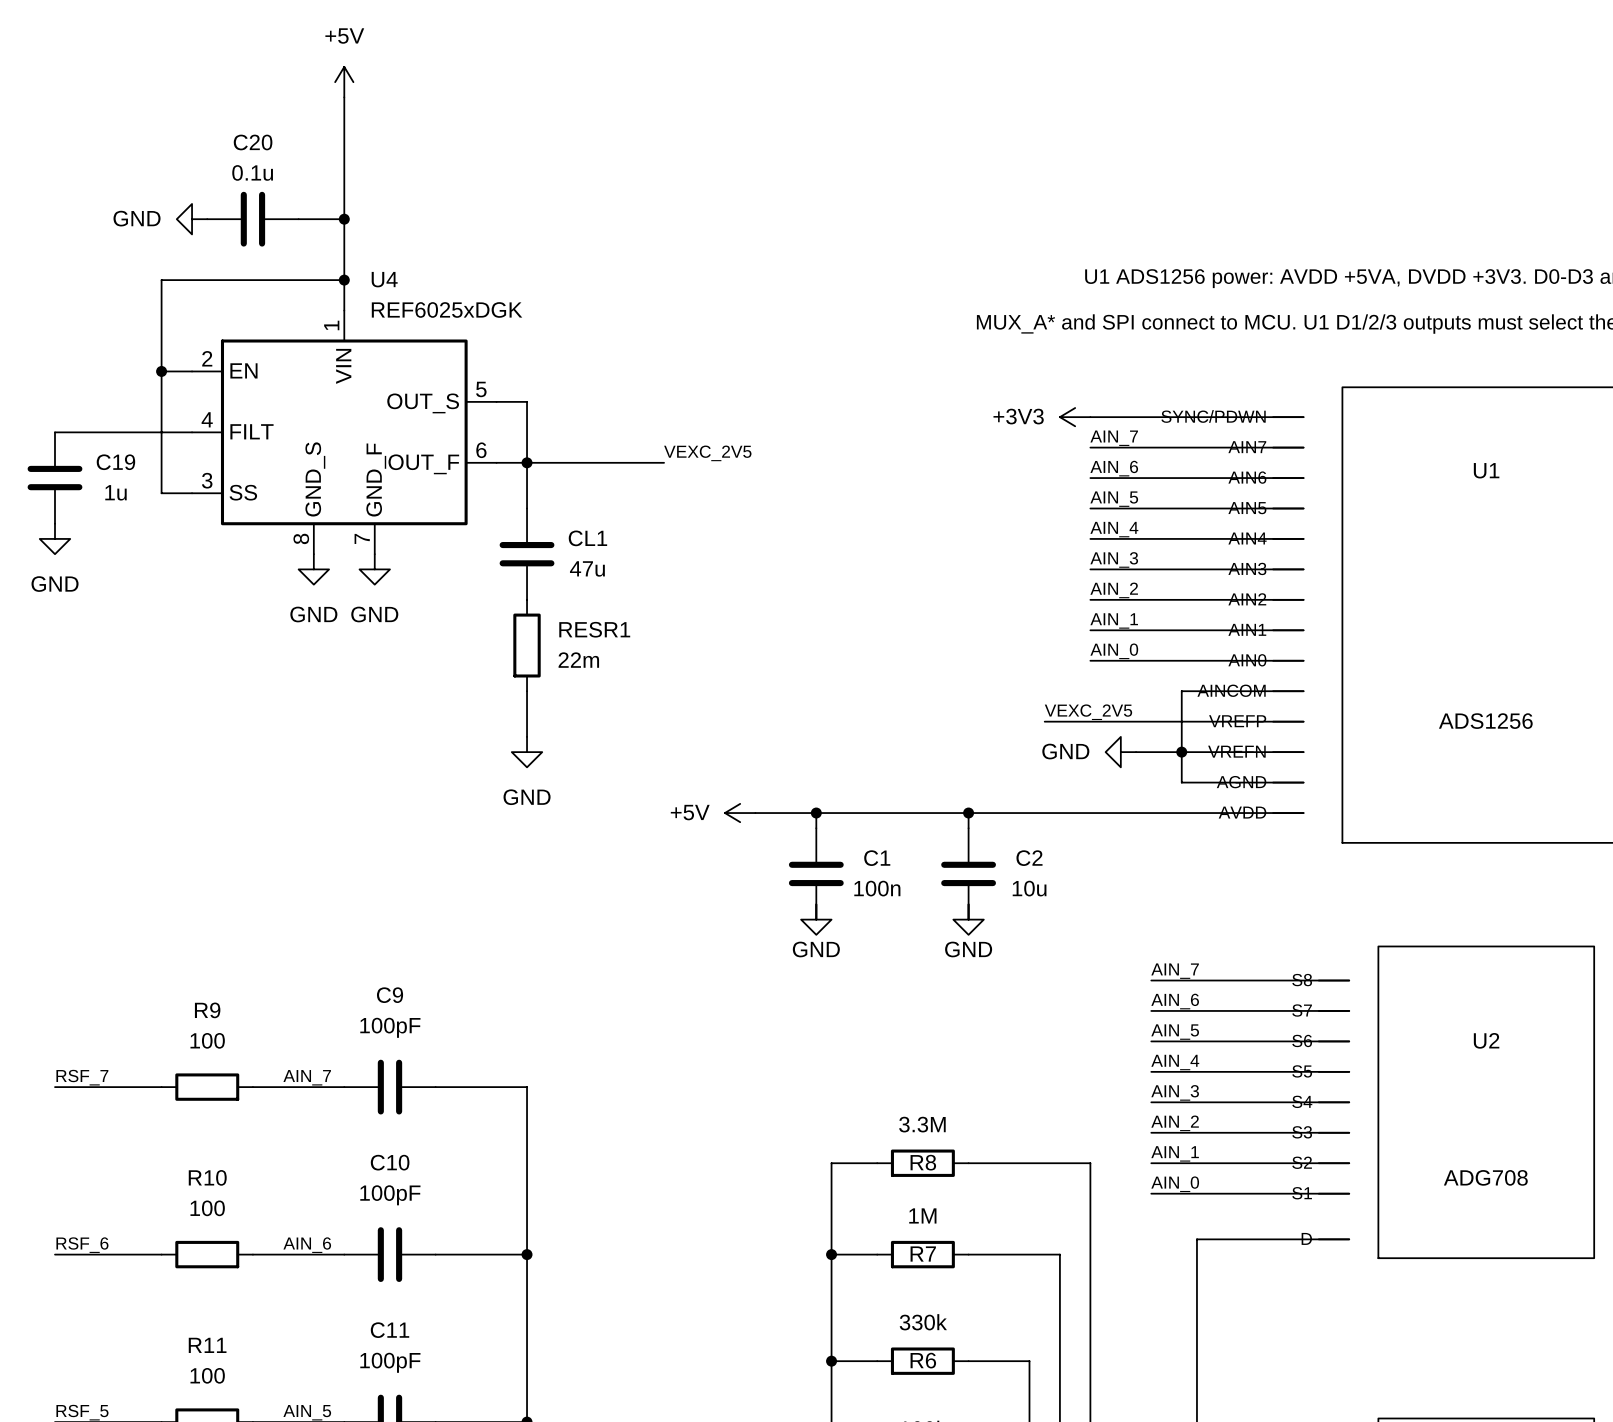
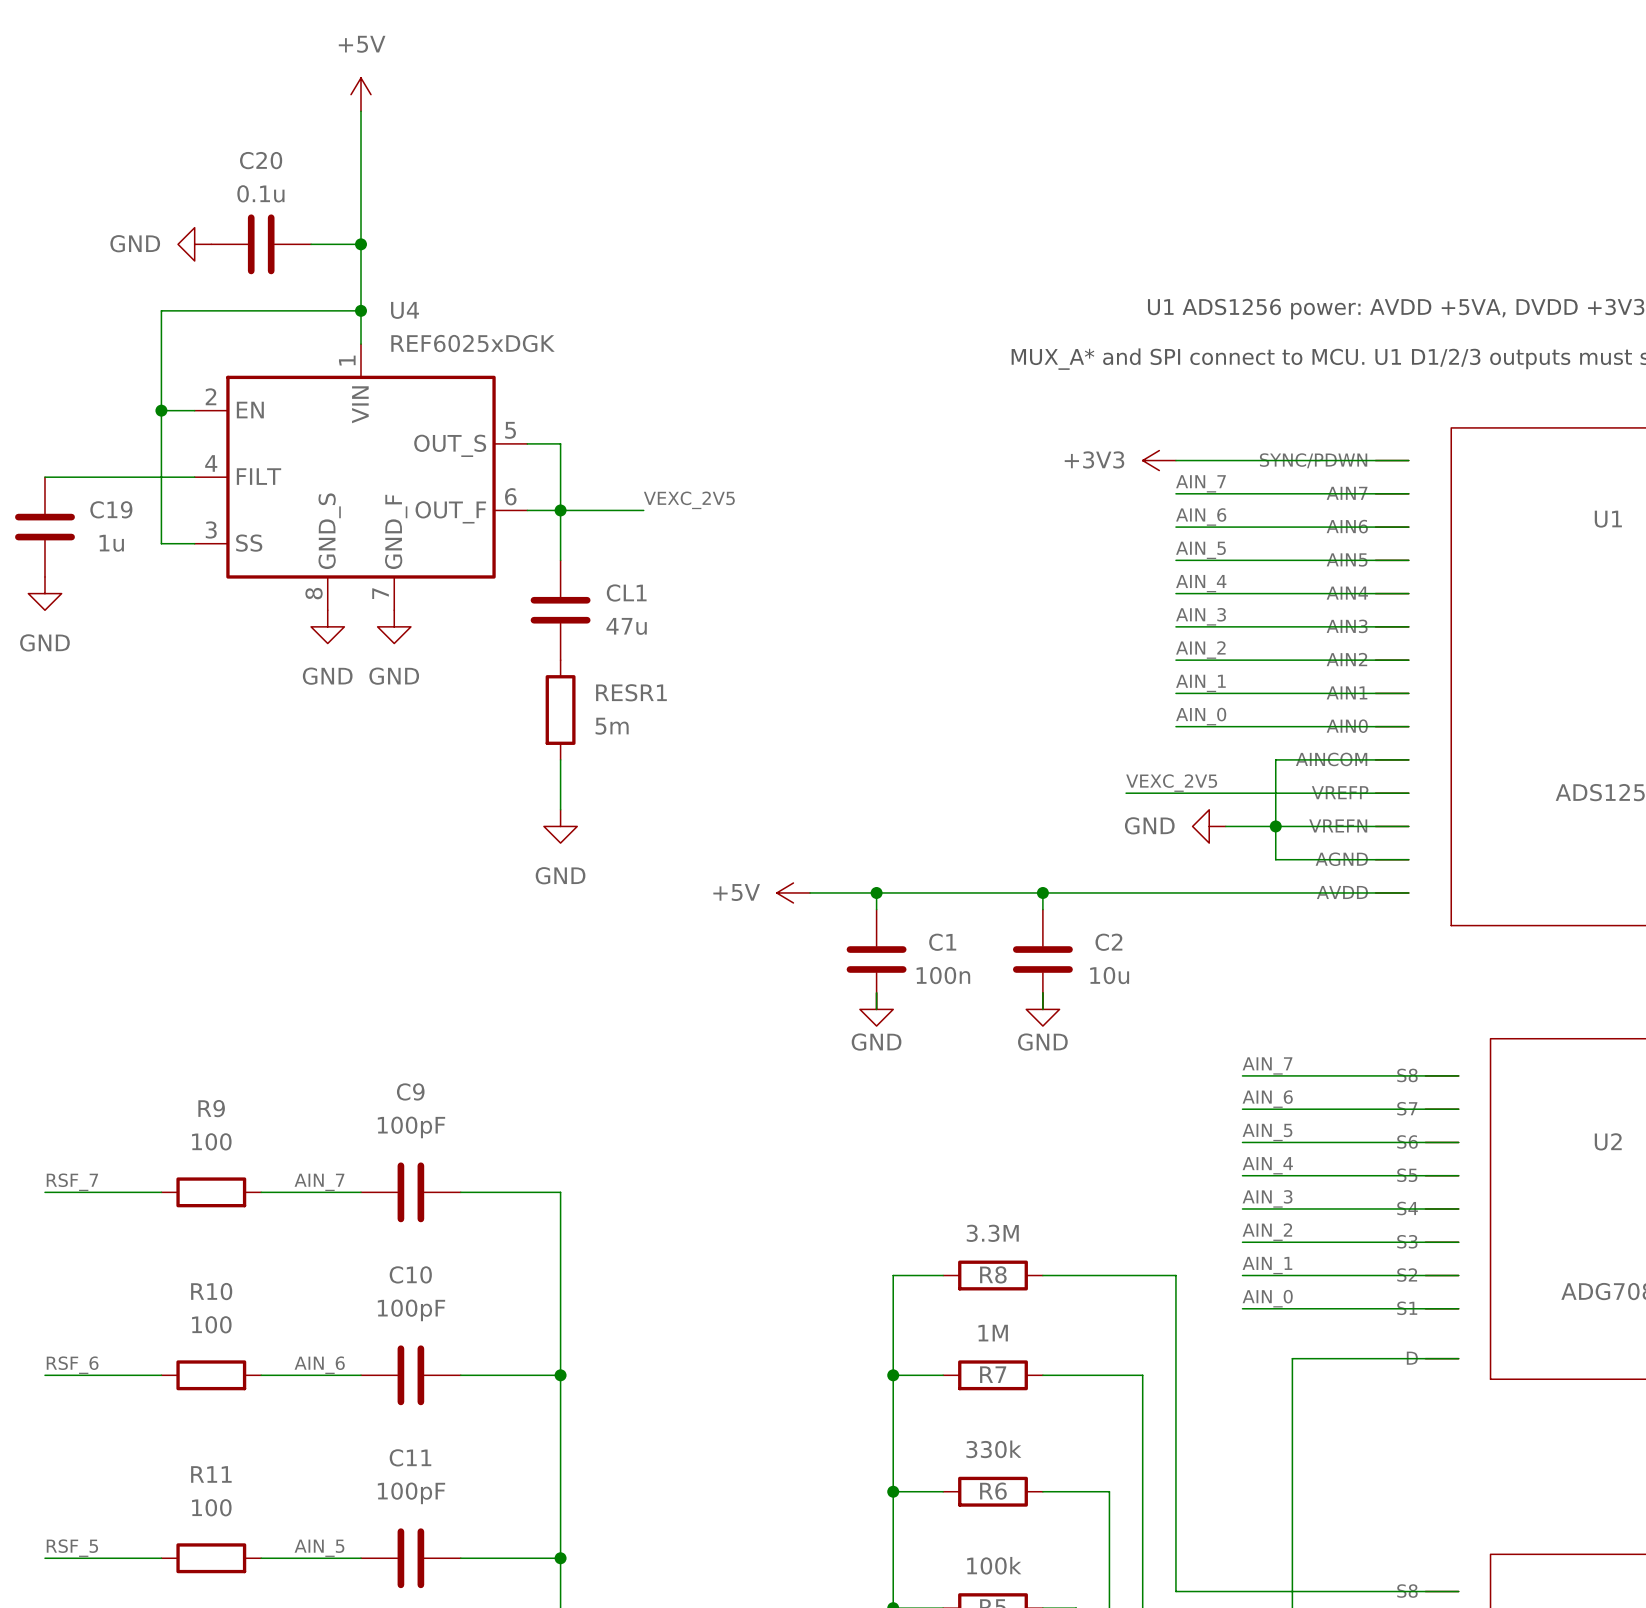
label position: VEXC_2V5 (707, 453) -> VEXC_2V5 (689, 500)
wire: (603, 462) (664, 462) -> none
RESR1 value: 22m (578, 660) -> 5m (612, 726)

